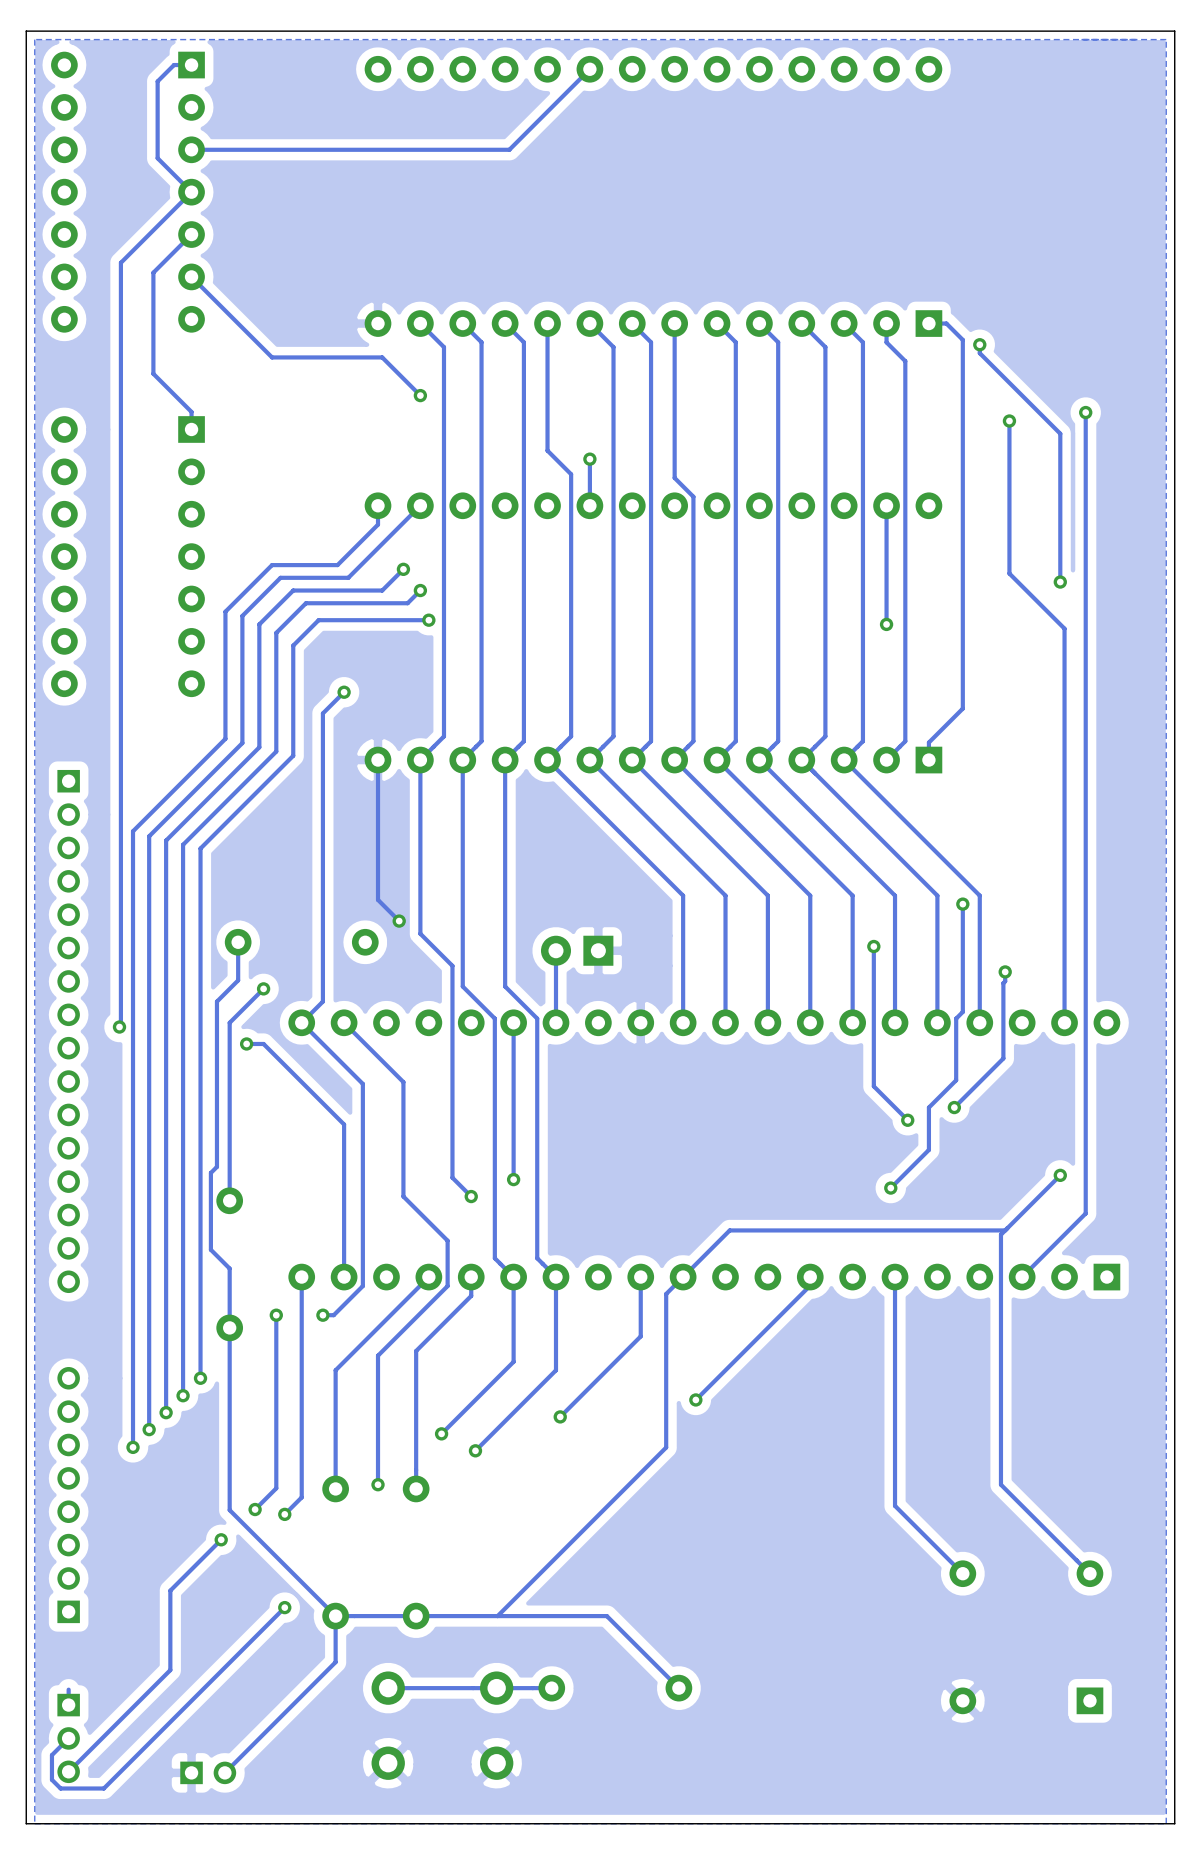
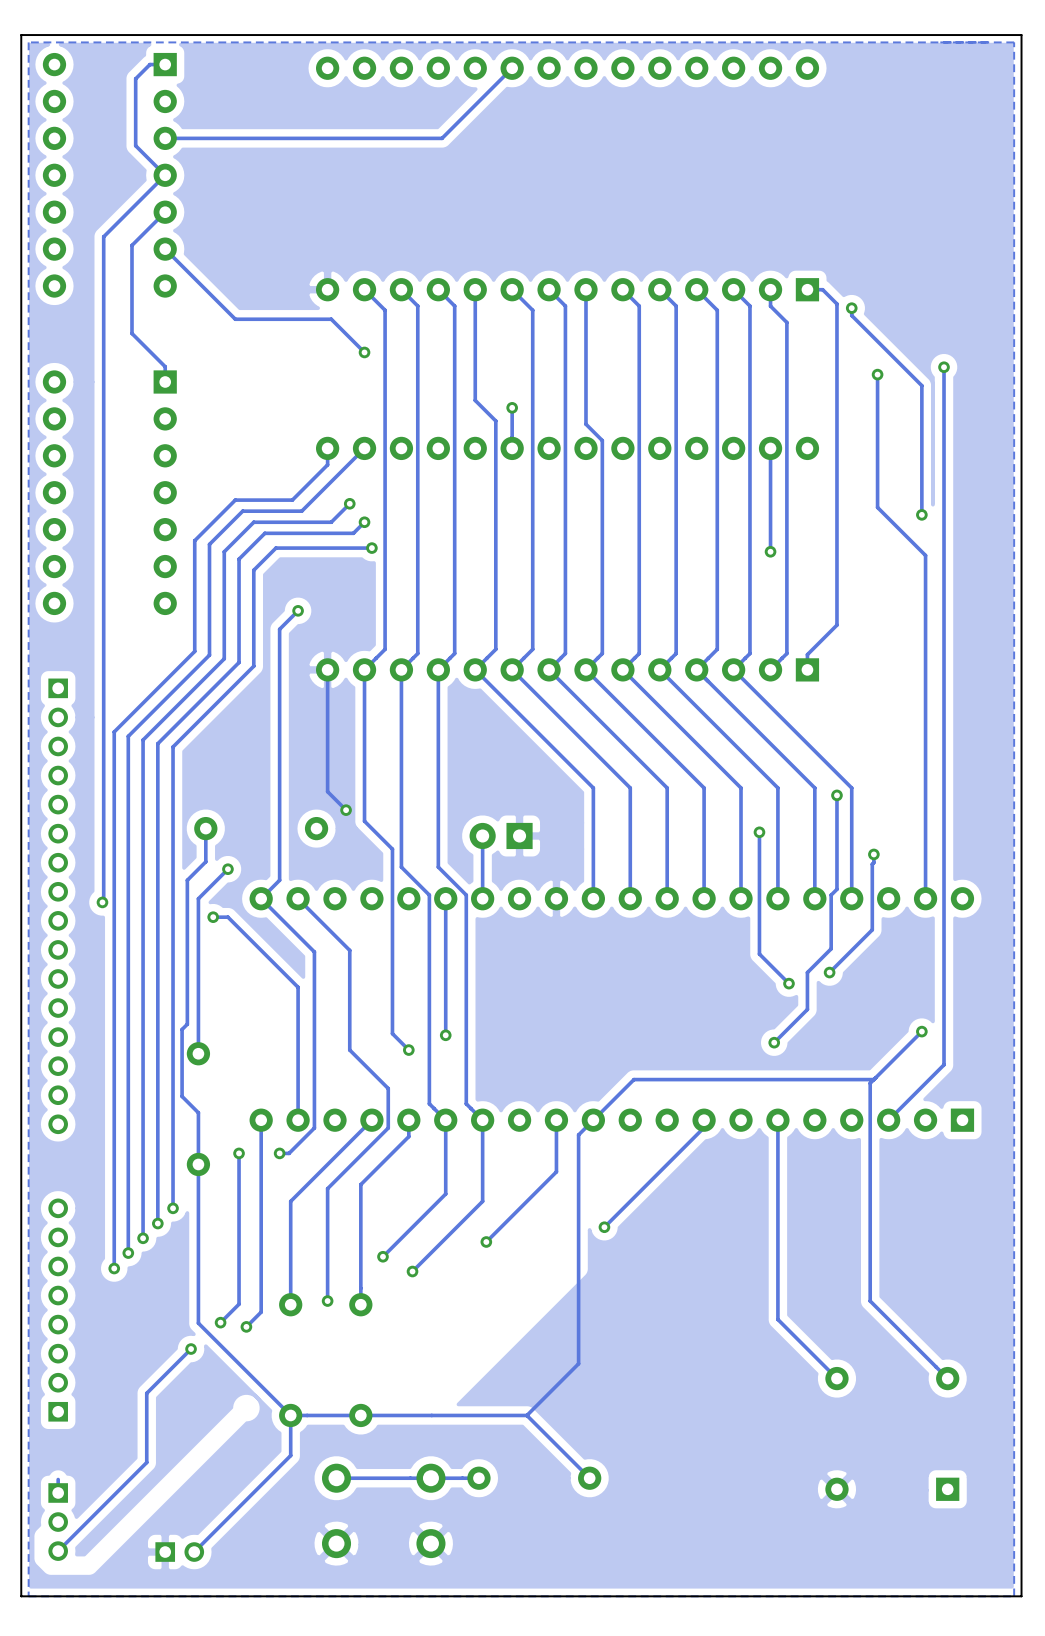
track: (666, 1447) (497, 1616) -> (578, 1268) (578, 1363) (526, 1415)
track: (284, 1607) (103, 1788) (60, 1788) (51, 1779) (51, 1755) (68, 1738) -> none
via: (284, 1607) -> none

